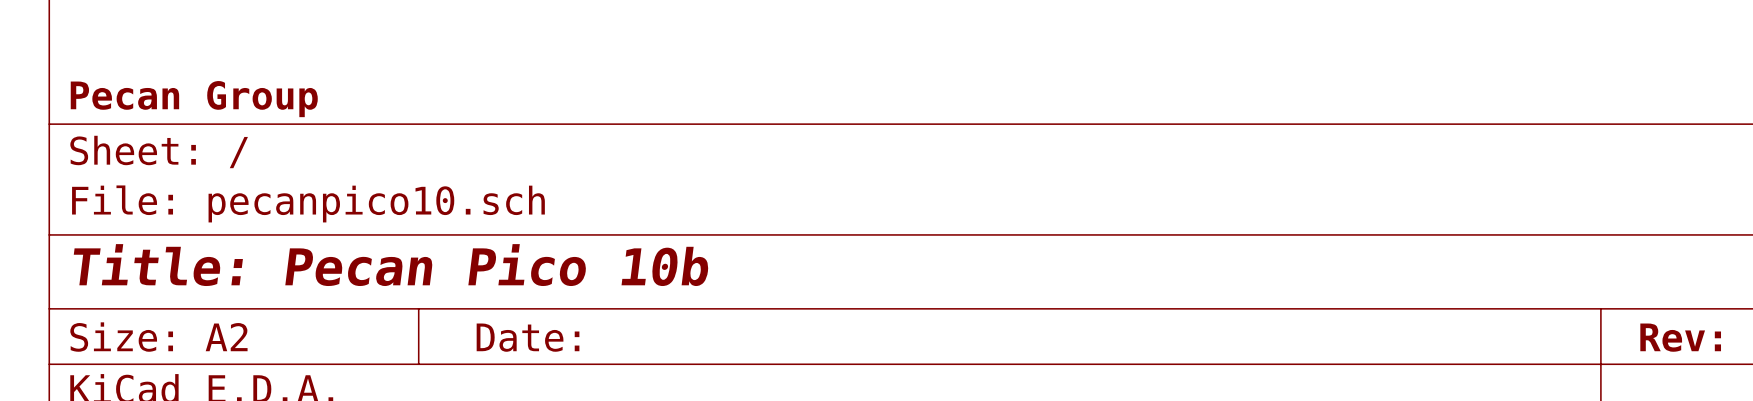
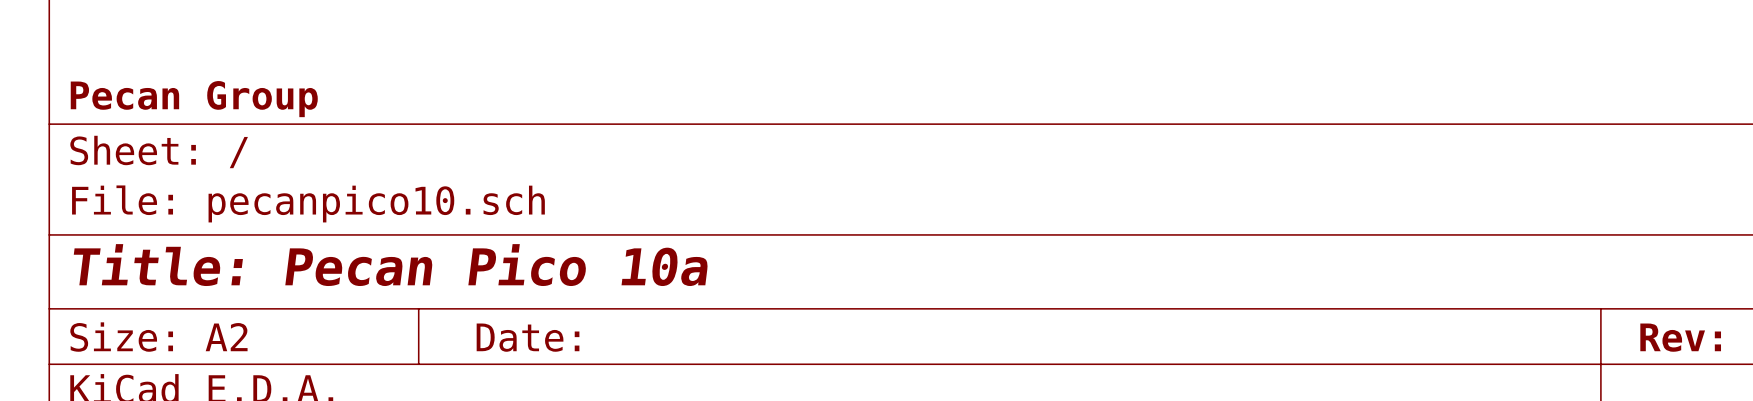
title block: Title: Pecan Pico 10b (391, 265) -> Title: Pecan Pico 10a (390, 265)

